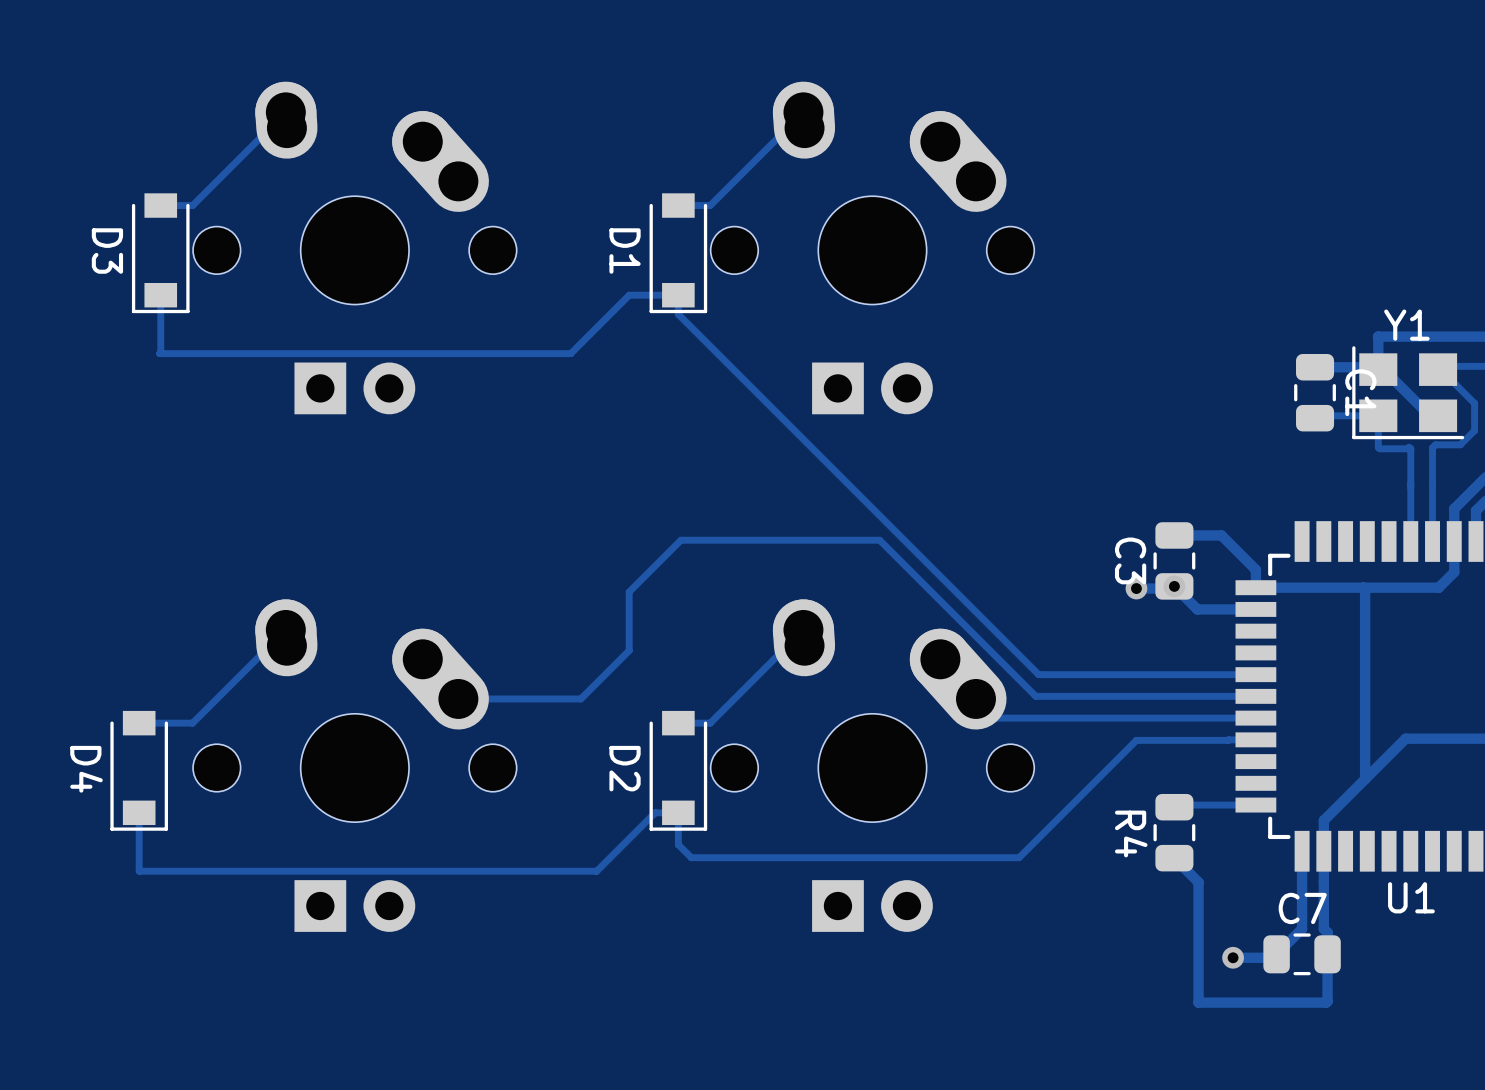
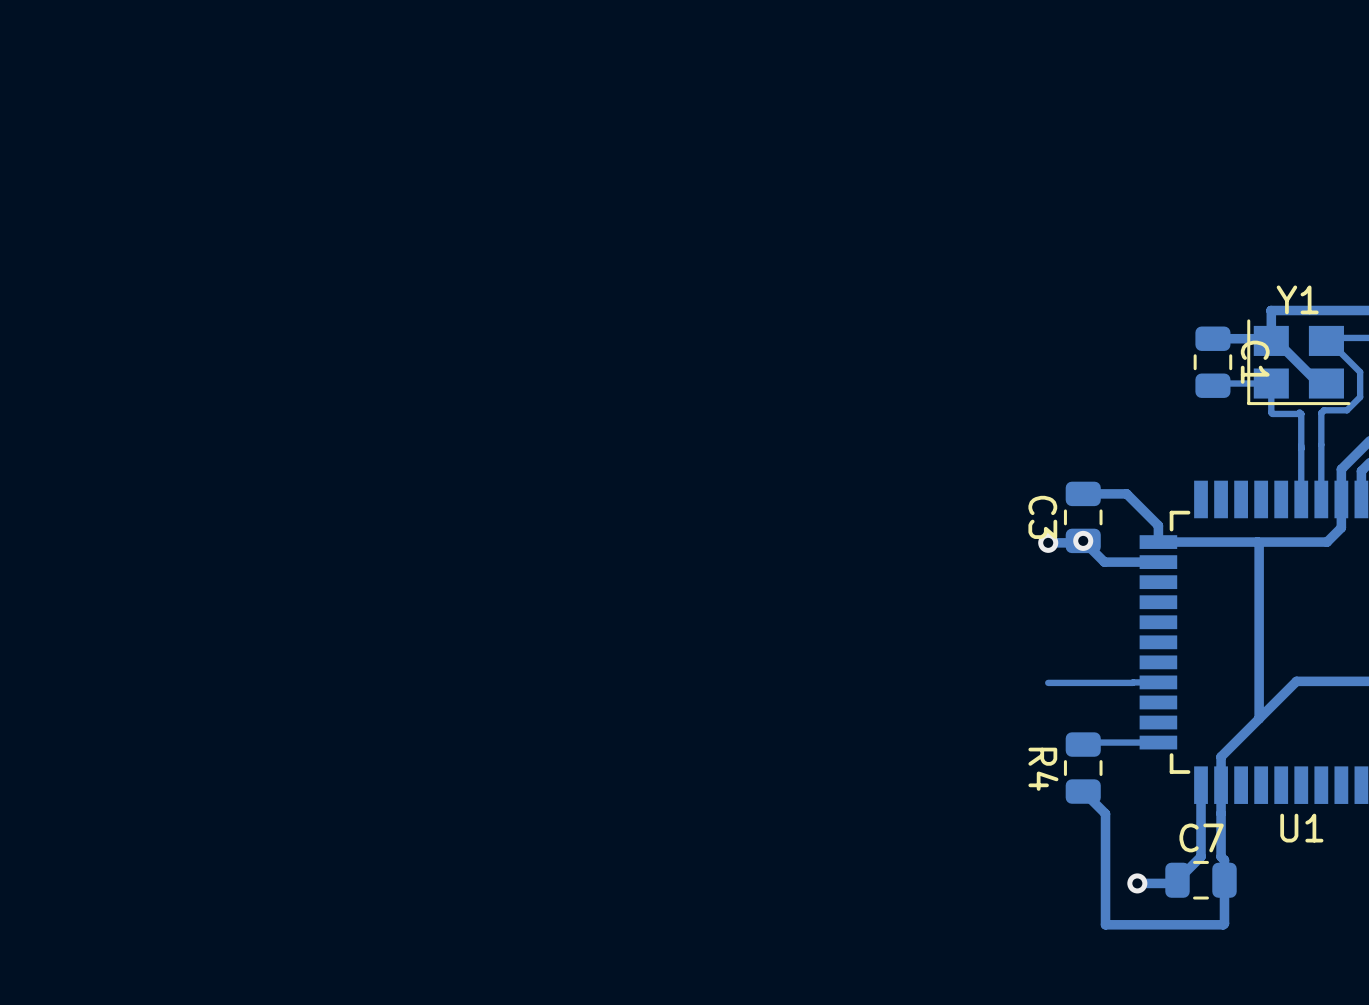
track: (286, 128) (270, 128) (192, 205) (160, 205) -> none
track: (804, 128) (787, 128) (710, 205) (678, 205) -> none
part: (354, 248) -> none
part: (872, 248) -> none
D3: (160, 253) -> none
D1: (678, 253) -> none
track: (160, 295) (159, 353) (570, 353) (629, 295) (678, 295) (678, 314) (1038, 674) (1255, 674) -> none
track: (285, 629) (192, 723) (139, 723) -> none
track: (804, 645) (787, 645) (710, 723) (678, 723) -> none
track: (1255, 696) (1035, 696) (879, 540) (680, 540) (629, 591) (629, 650) (580, 698) (458, 698) -> none
track: (975, 698) (995, 718) (1255, 718) -> none
track: (1136, 740) (1019, 857) (691, 857) (678, 844) (678, 812) (655, 812) (596, 871) -> none
part: (354, 765) -> none
part: (872, 765) -> none
D4: (139, 770) -> none
D2: (678, 770) -> none
track: (139, 812) (139, 870) -> none
track: (596, 871) (139, 871) -> none

